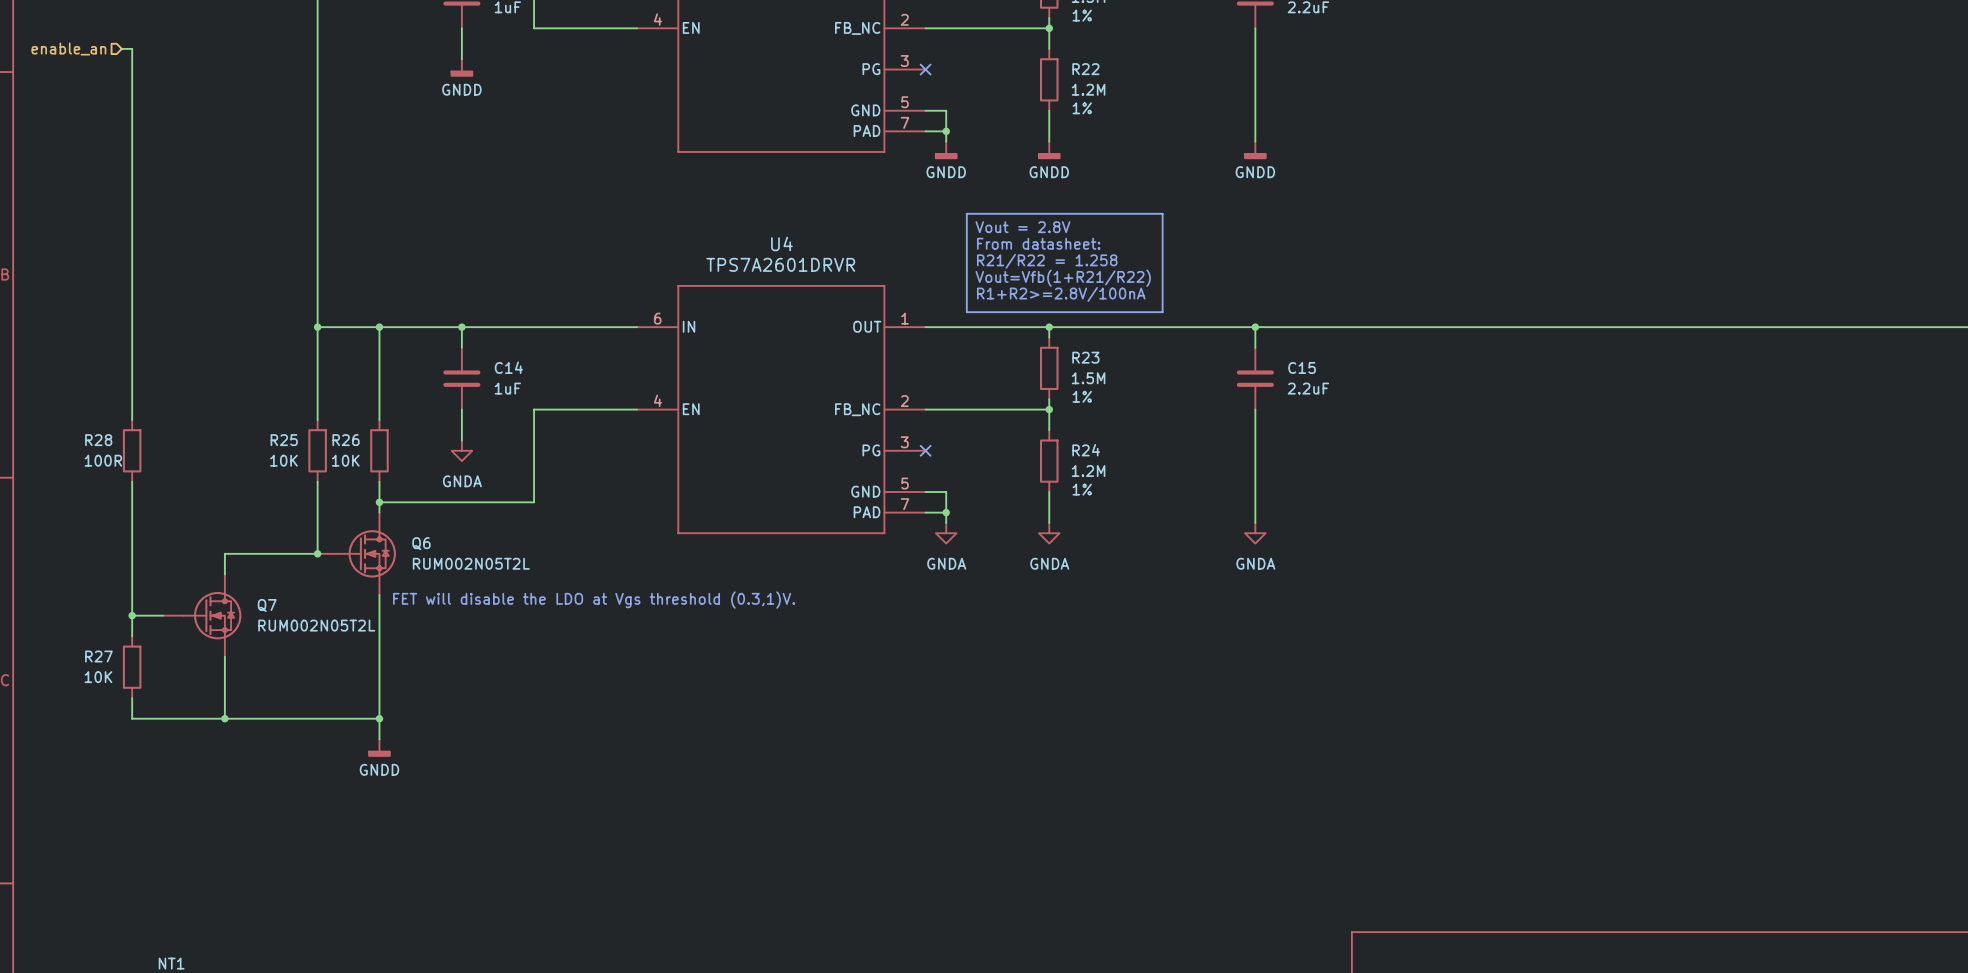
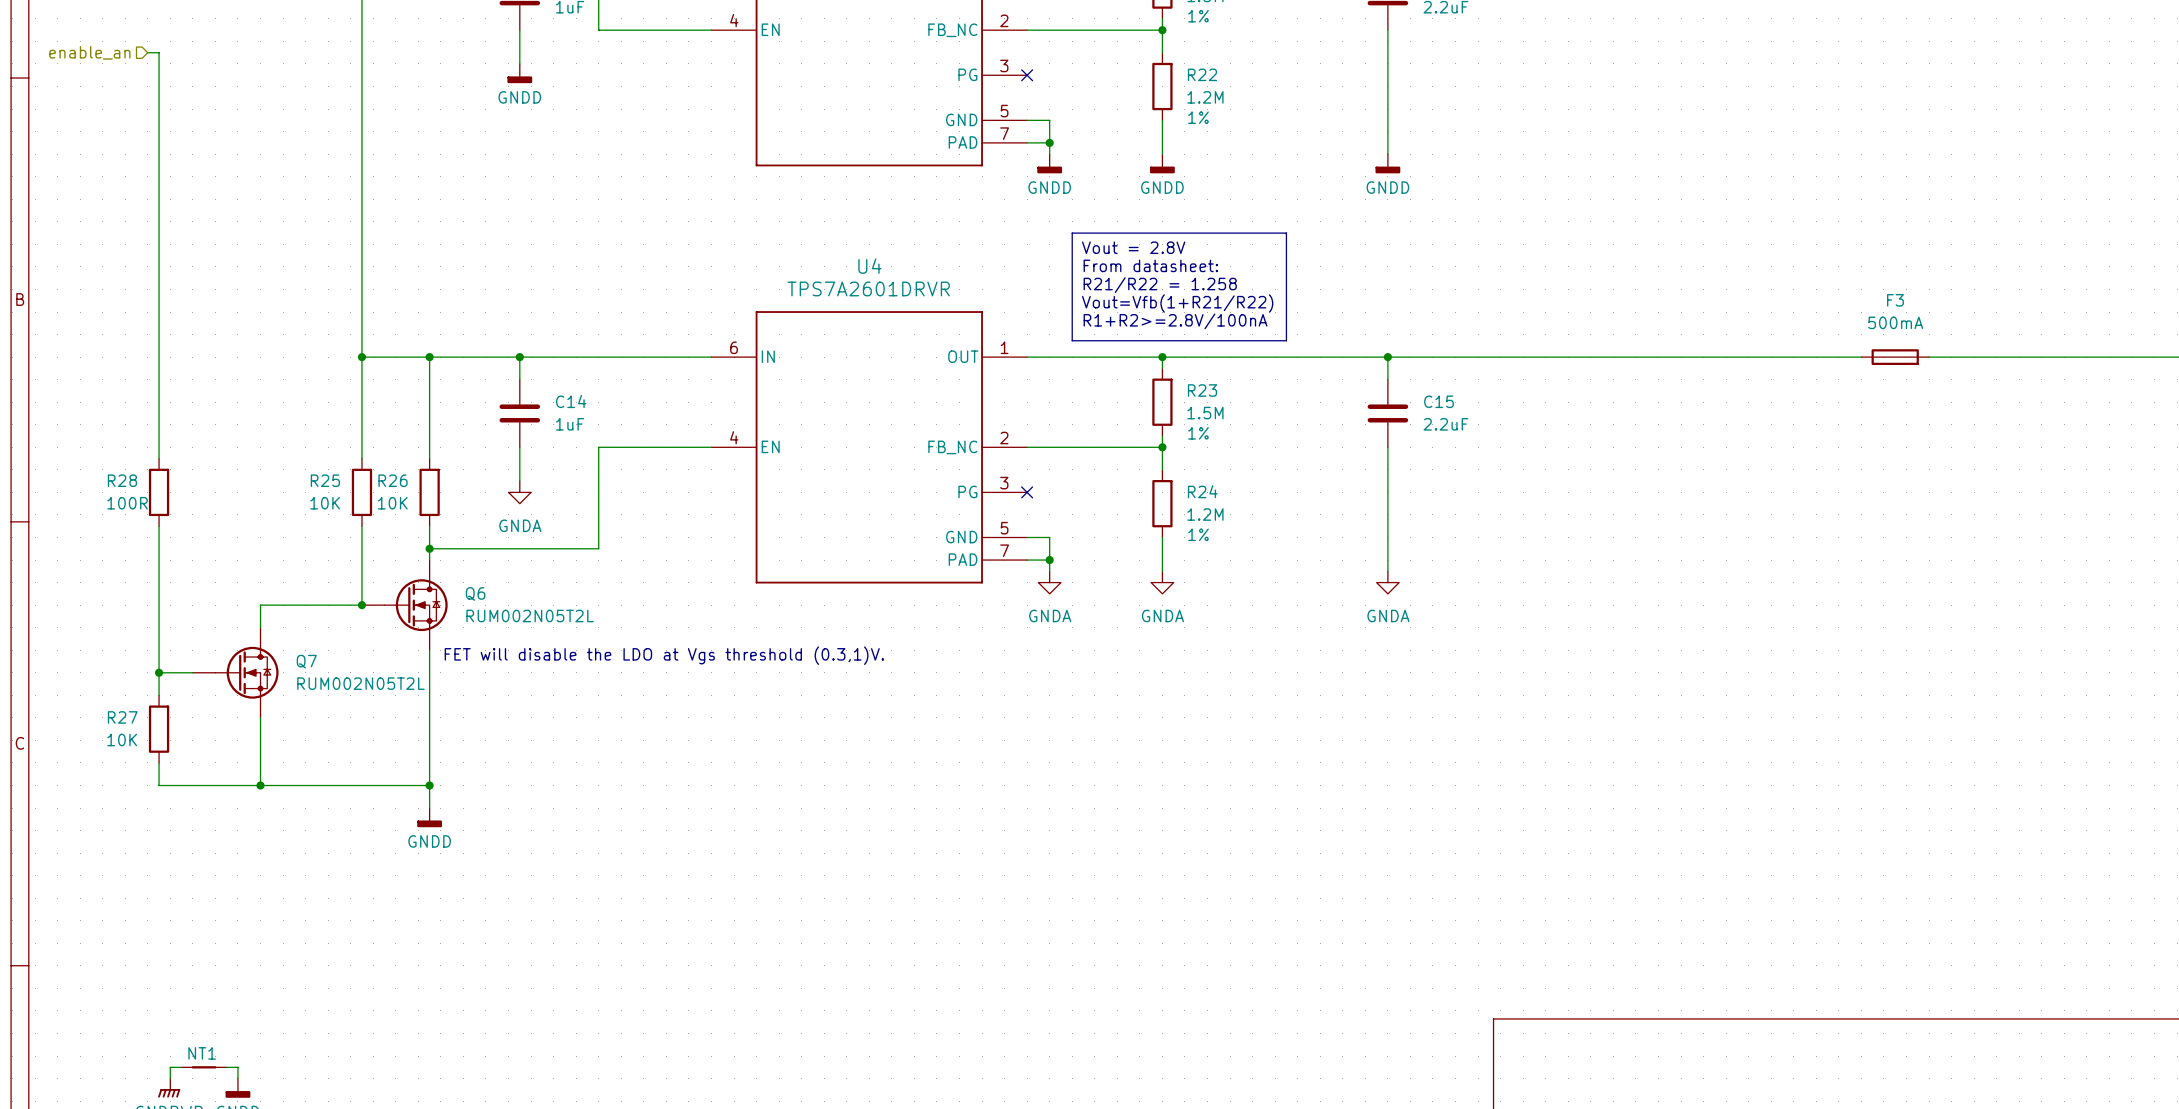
F3: none -> 500mA (1895, 357)

